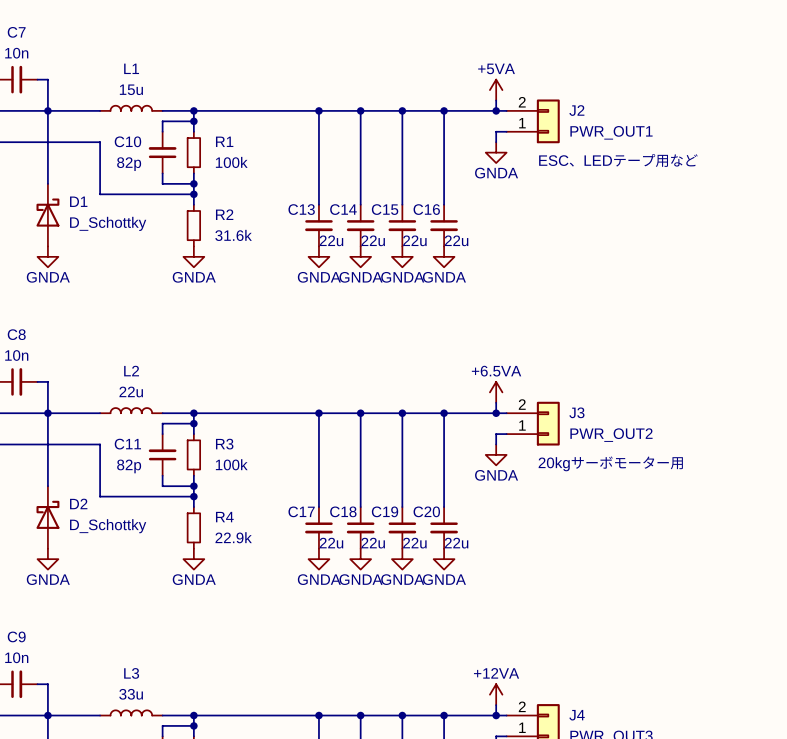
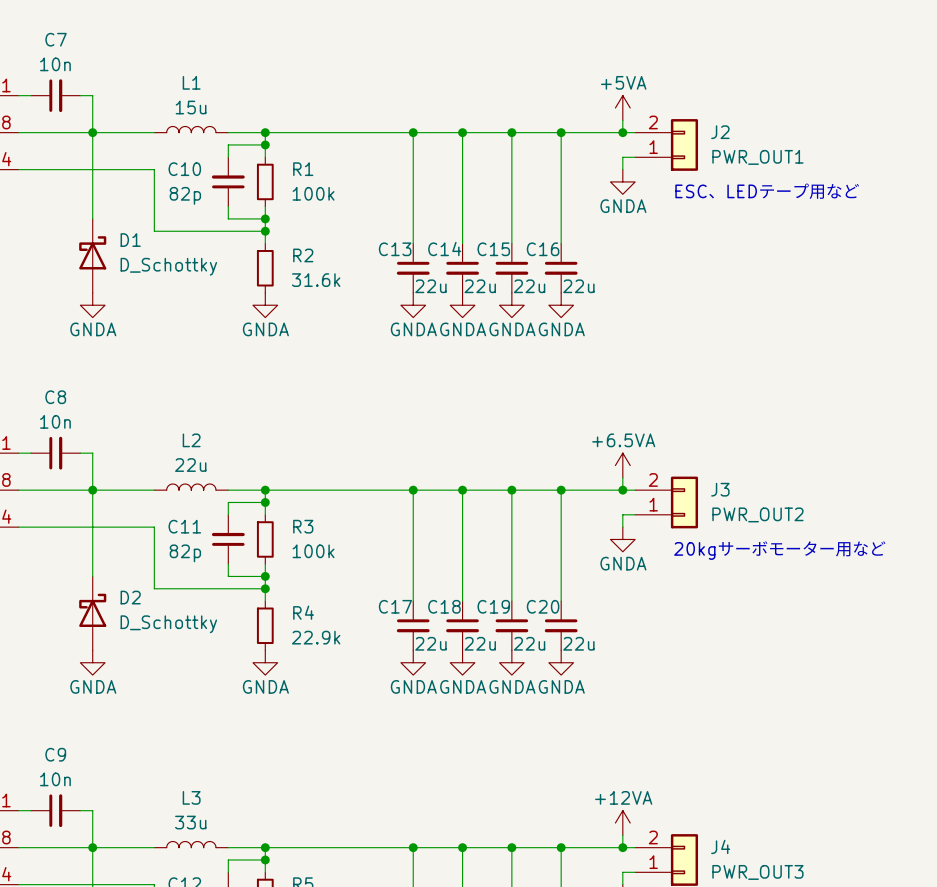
text: 20kgサーボモーター用 (610, 463) -> 20kgサーボモーター用など (780, 550)

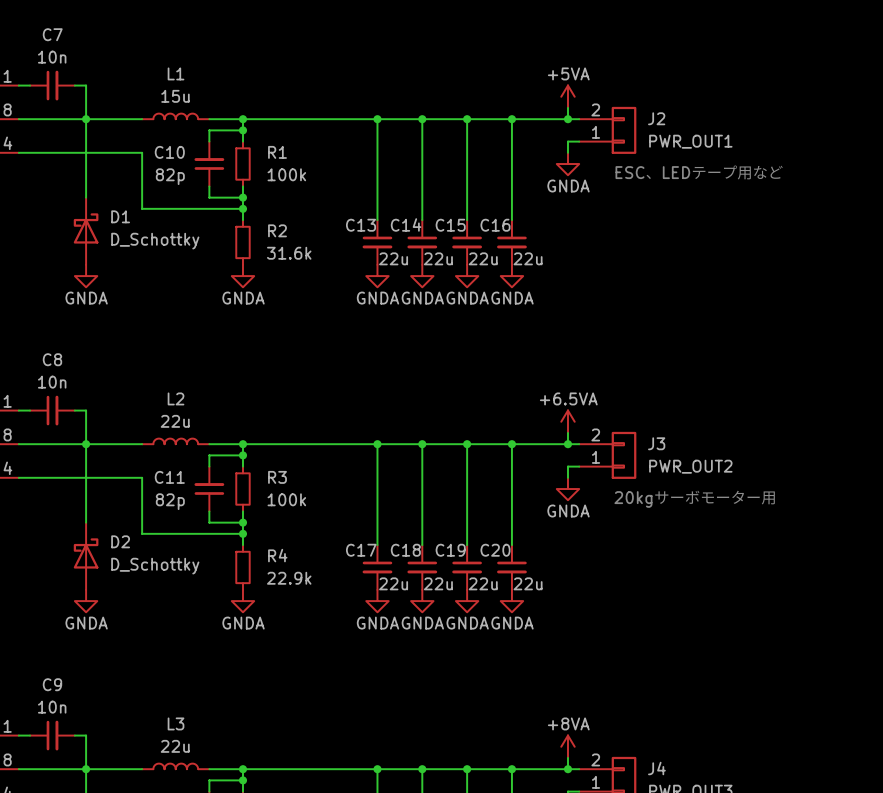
text: 20kgサーボモーター用など (780, 550) -> 20kgサーボモーター用 (695, 498)
L3 value: 33u (190, 822) -> 22u (175, 746)
power symbol: +12VA (622, 823) -> +8VA (567, 746)

